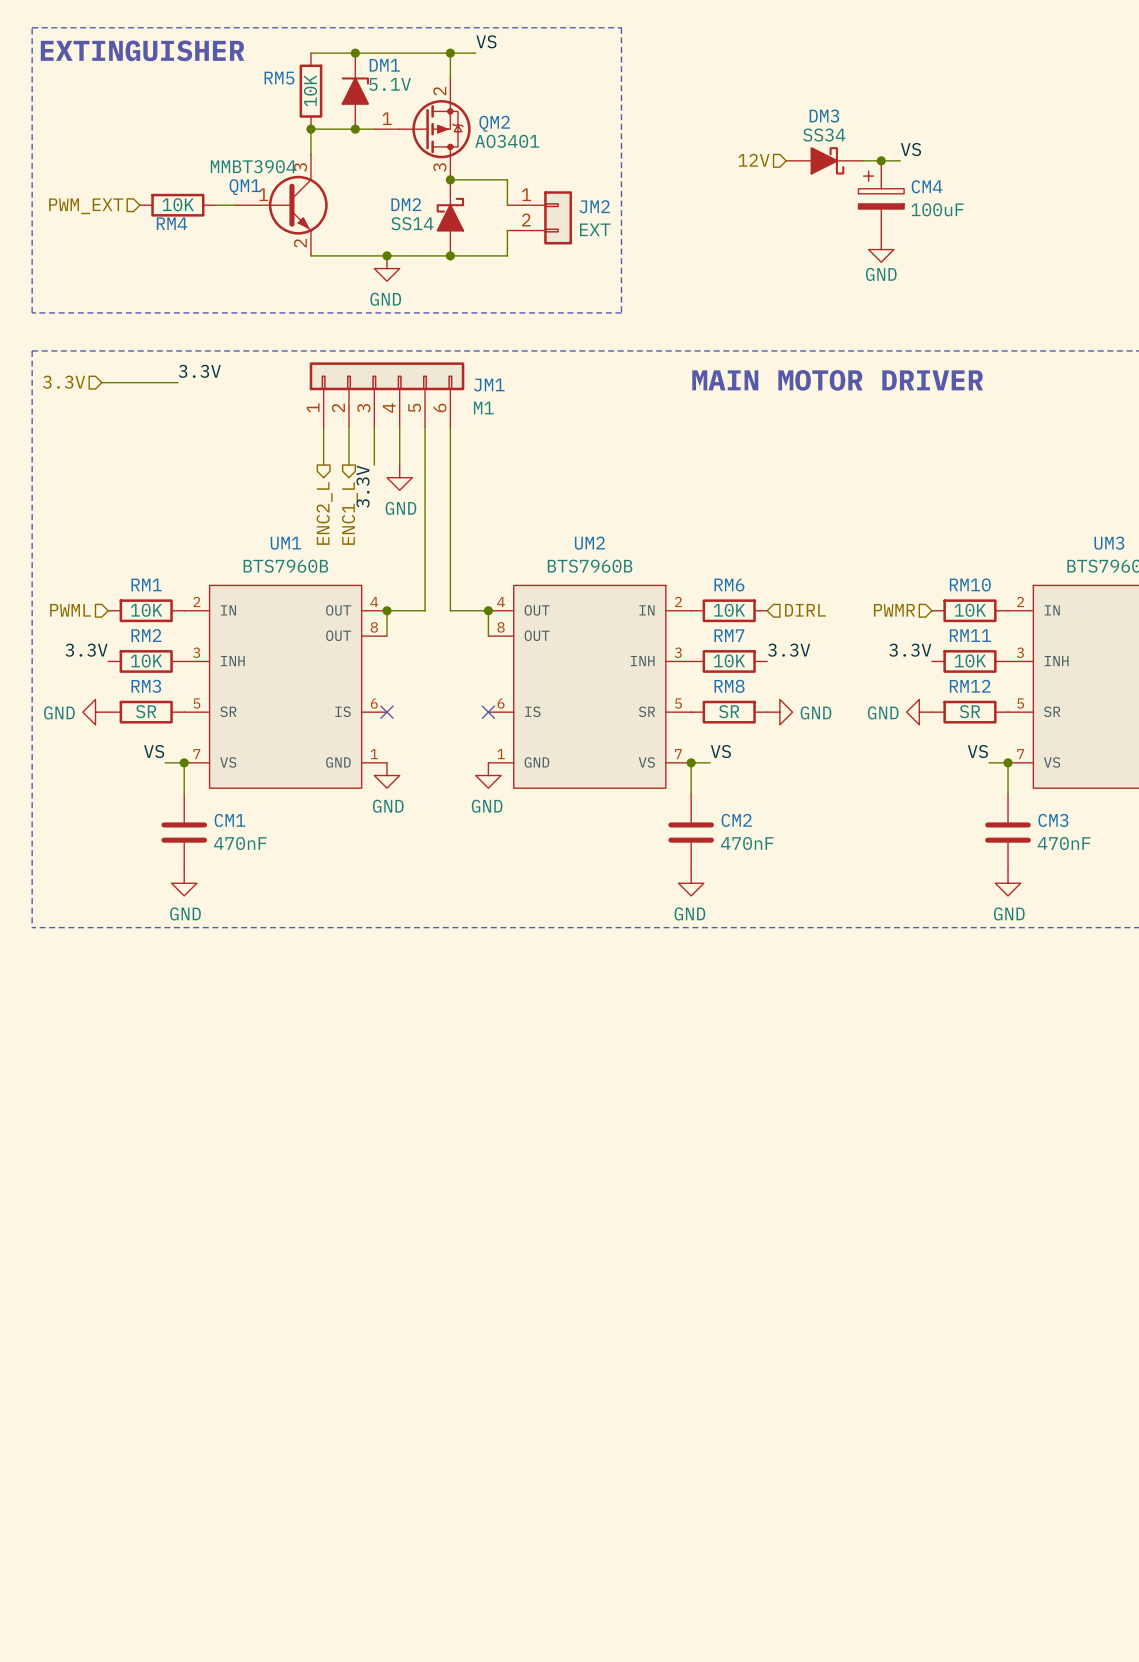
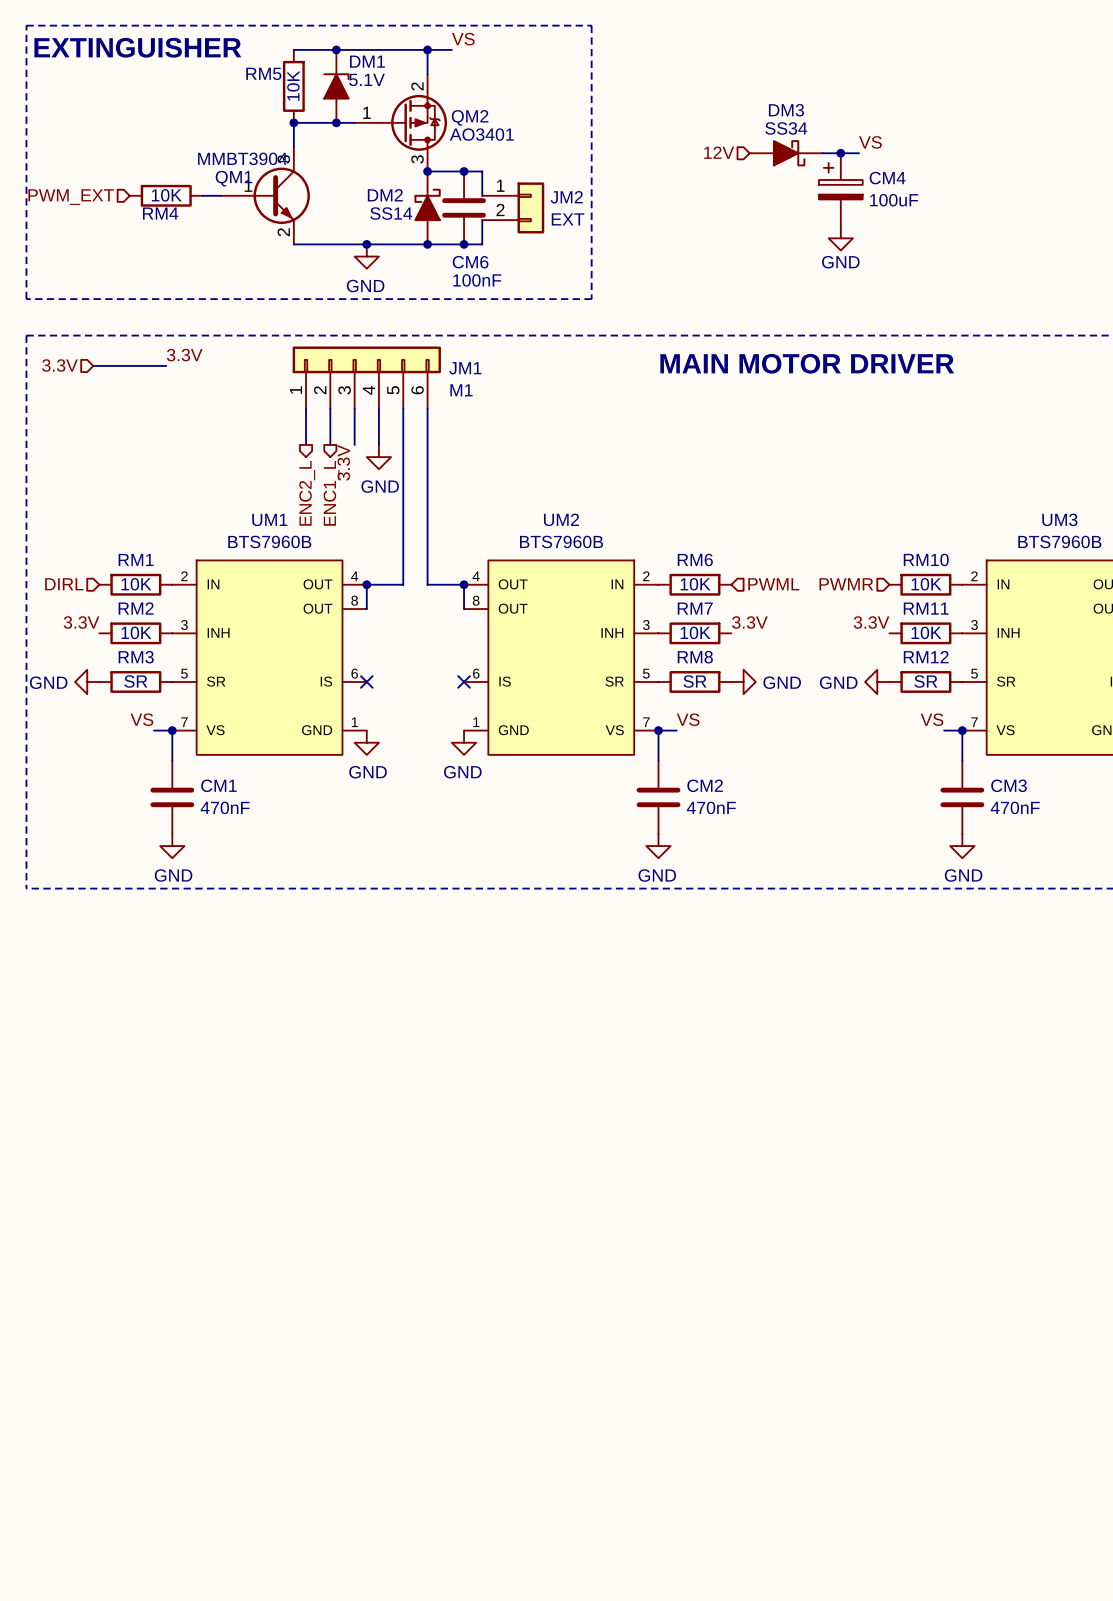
junction: none -> (464, 171)
CM6: none -> 100nF (464, 207)
junction: none -> (464, 244)
hierarchical label: PWML (70, 610) -> DIRL (64, 584)
hierarchical label: DIRL (805, 610) -> PWML (773, 584)

